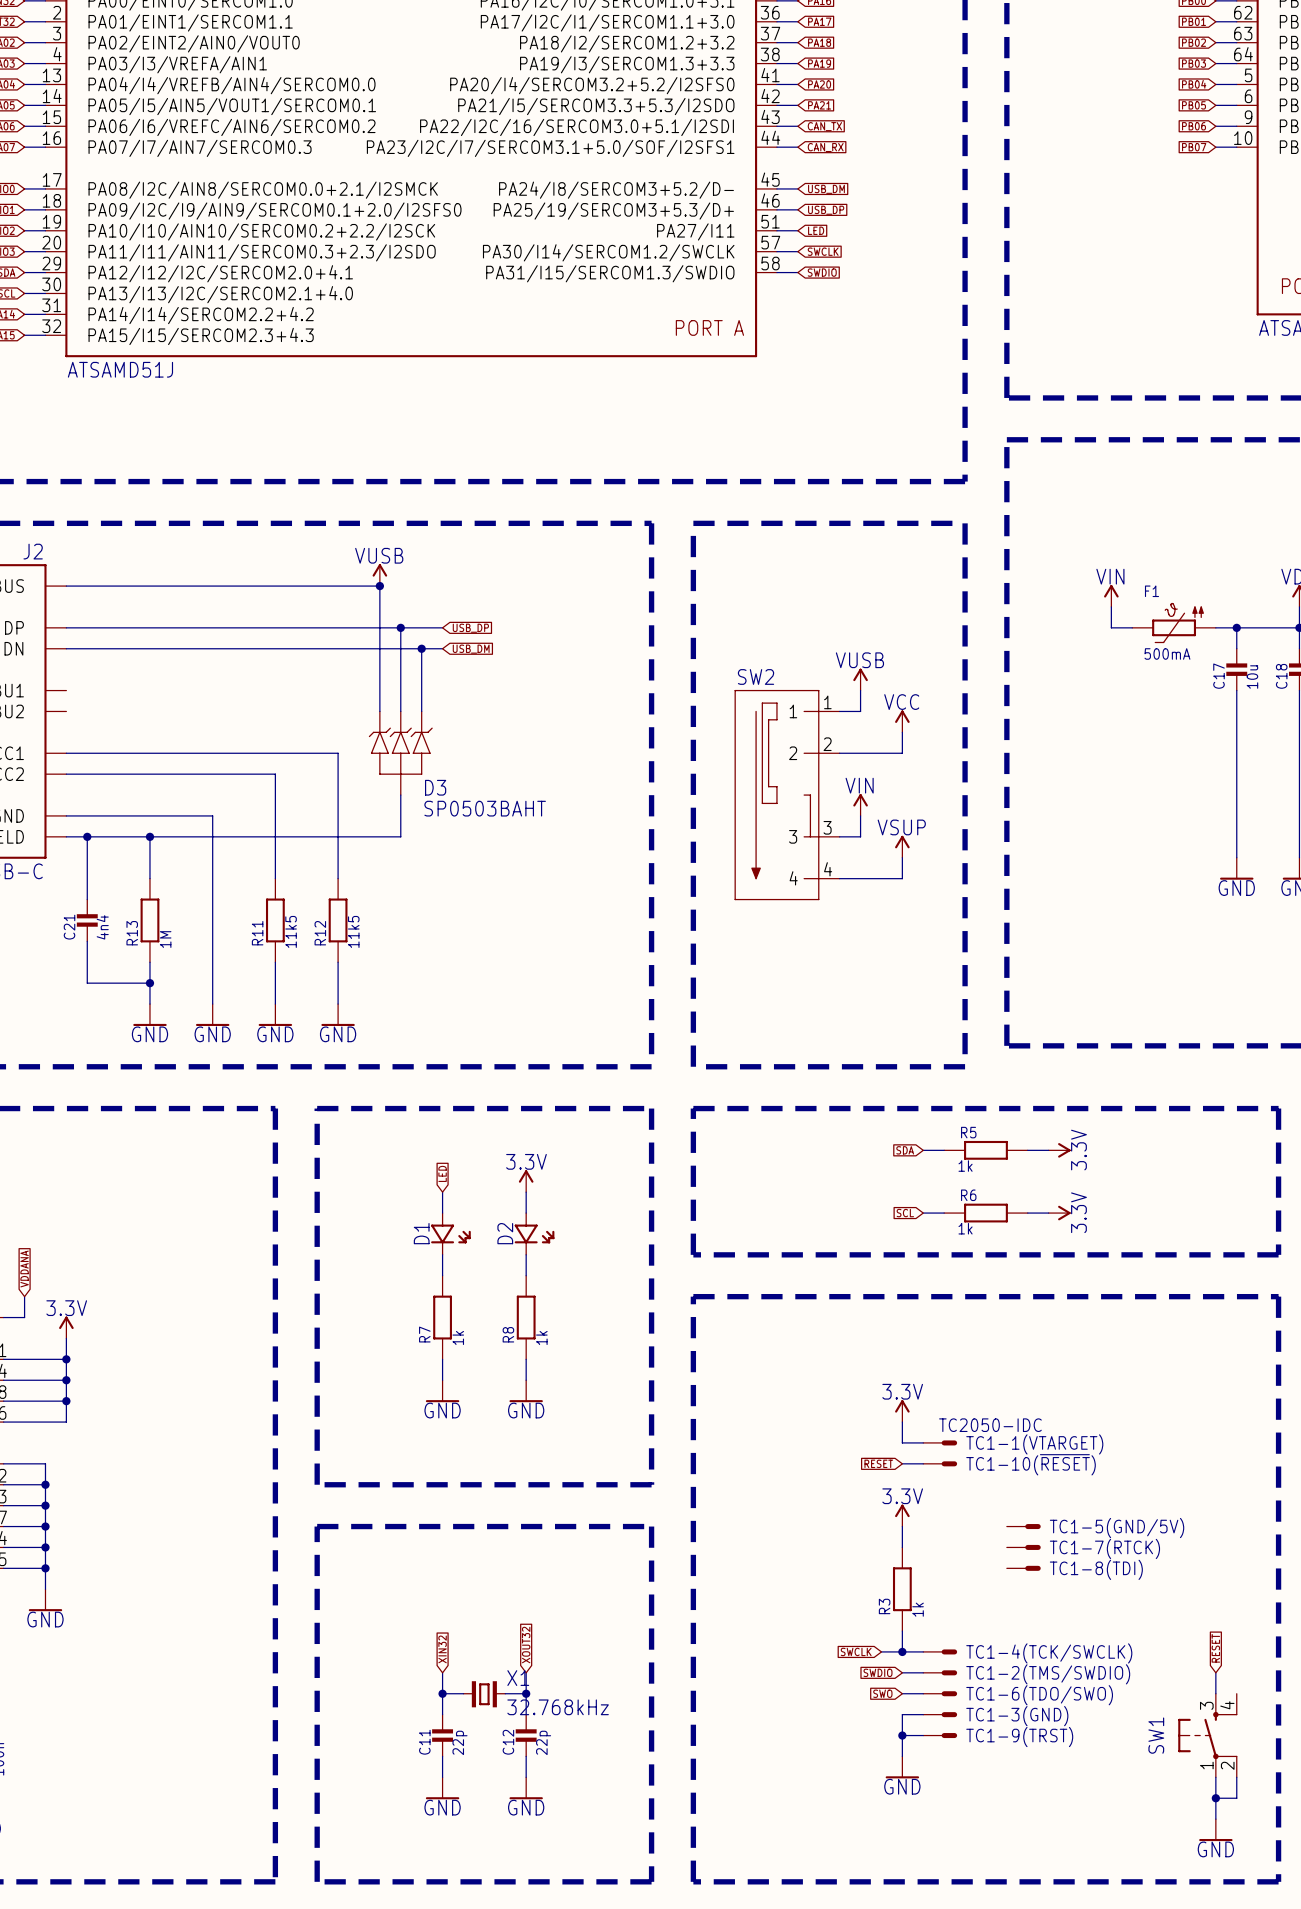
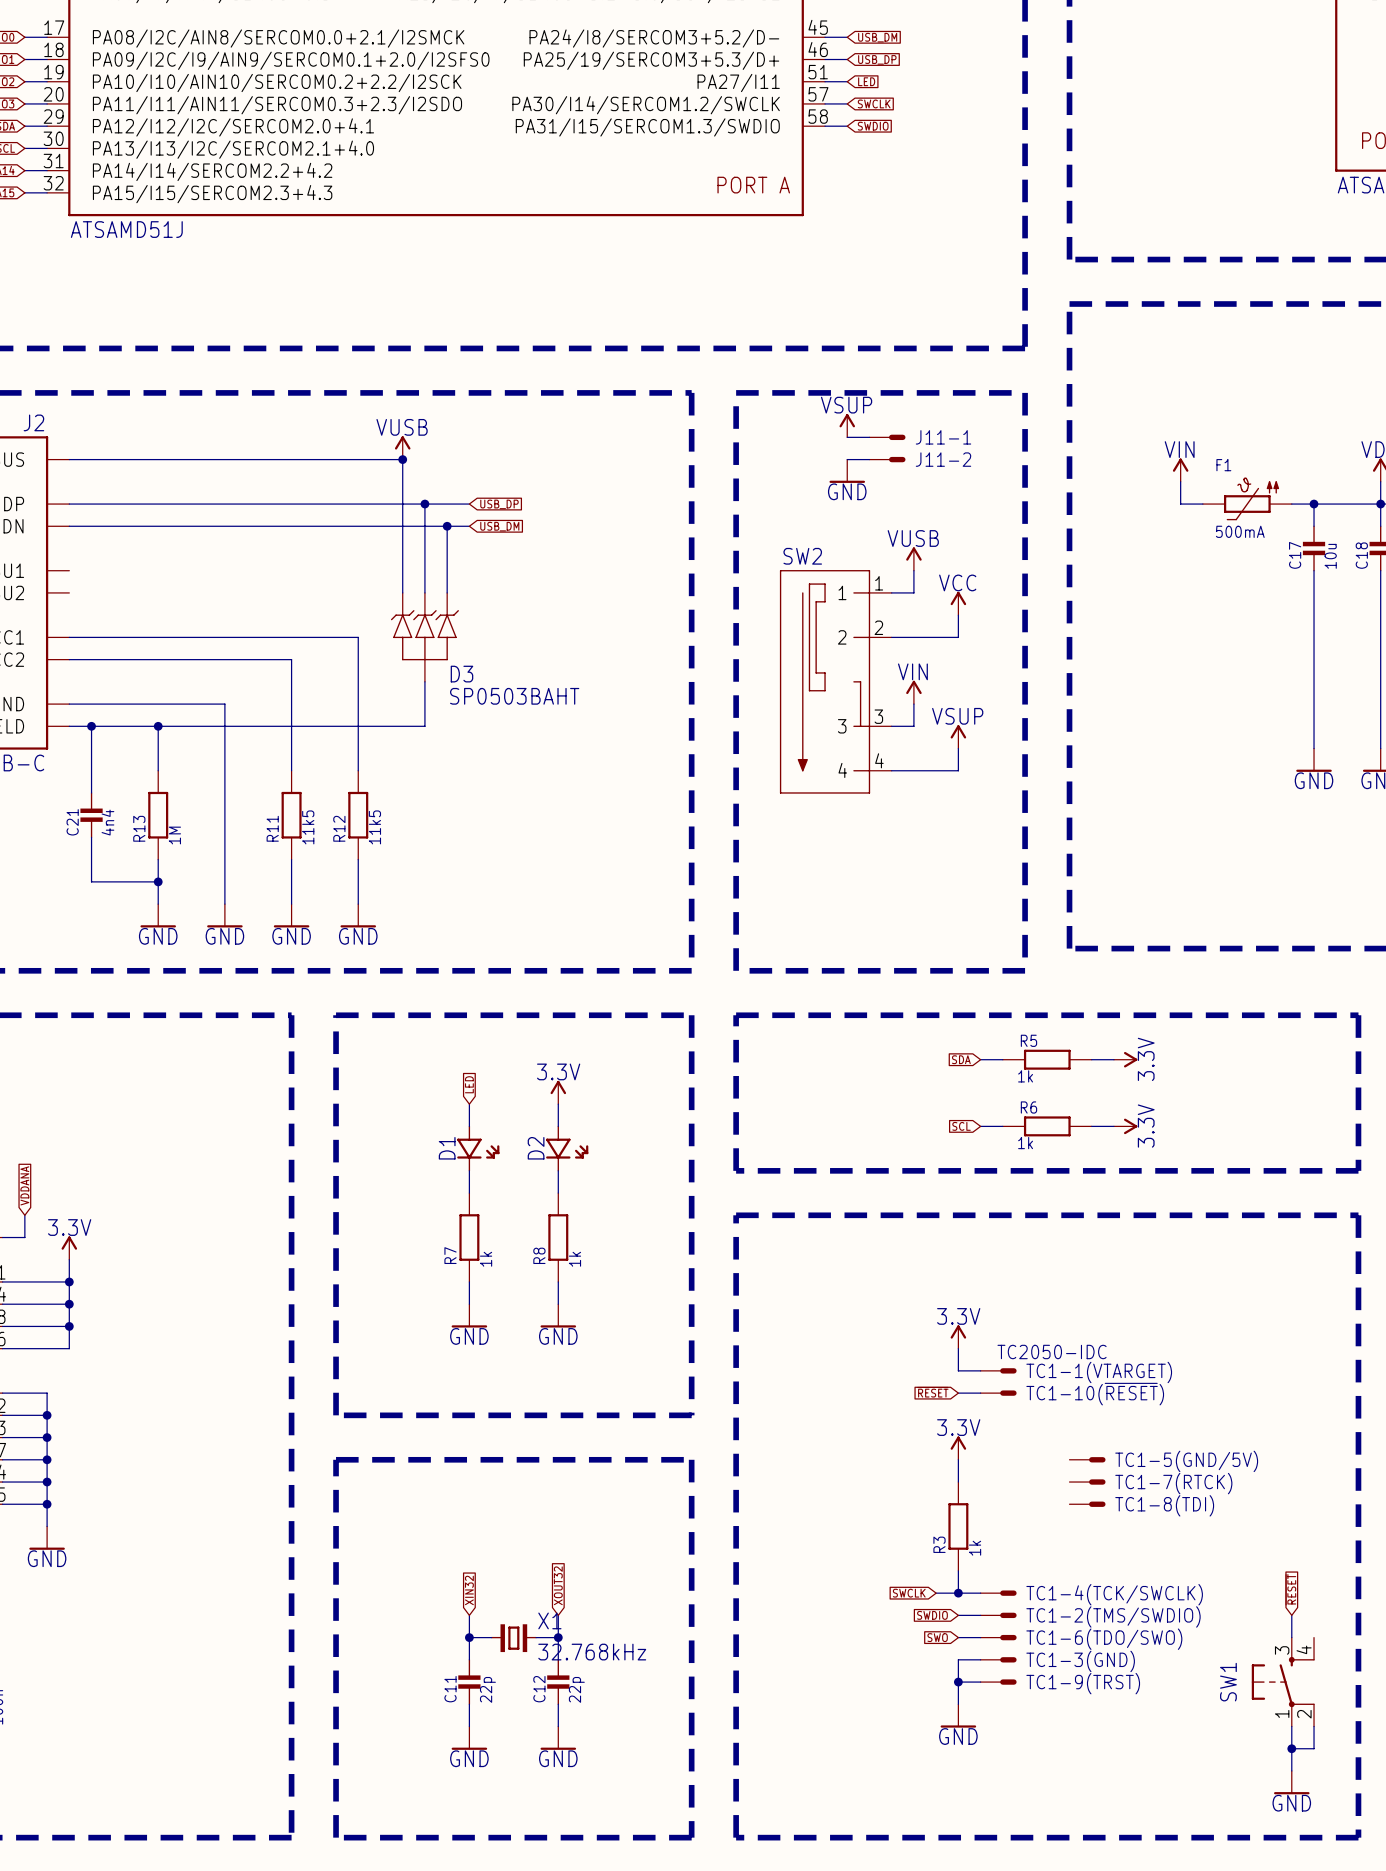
power symbol: none -> VSUP (847, 425)
wire: none -> (847, 437) (869, 437)
J11-1: none -> (887, 437)
wire: none -> (847, 459) (869, 459)
J11-2: none -> (887, 459)
power symbol: none -> GND (847, 471)

